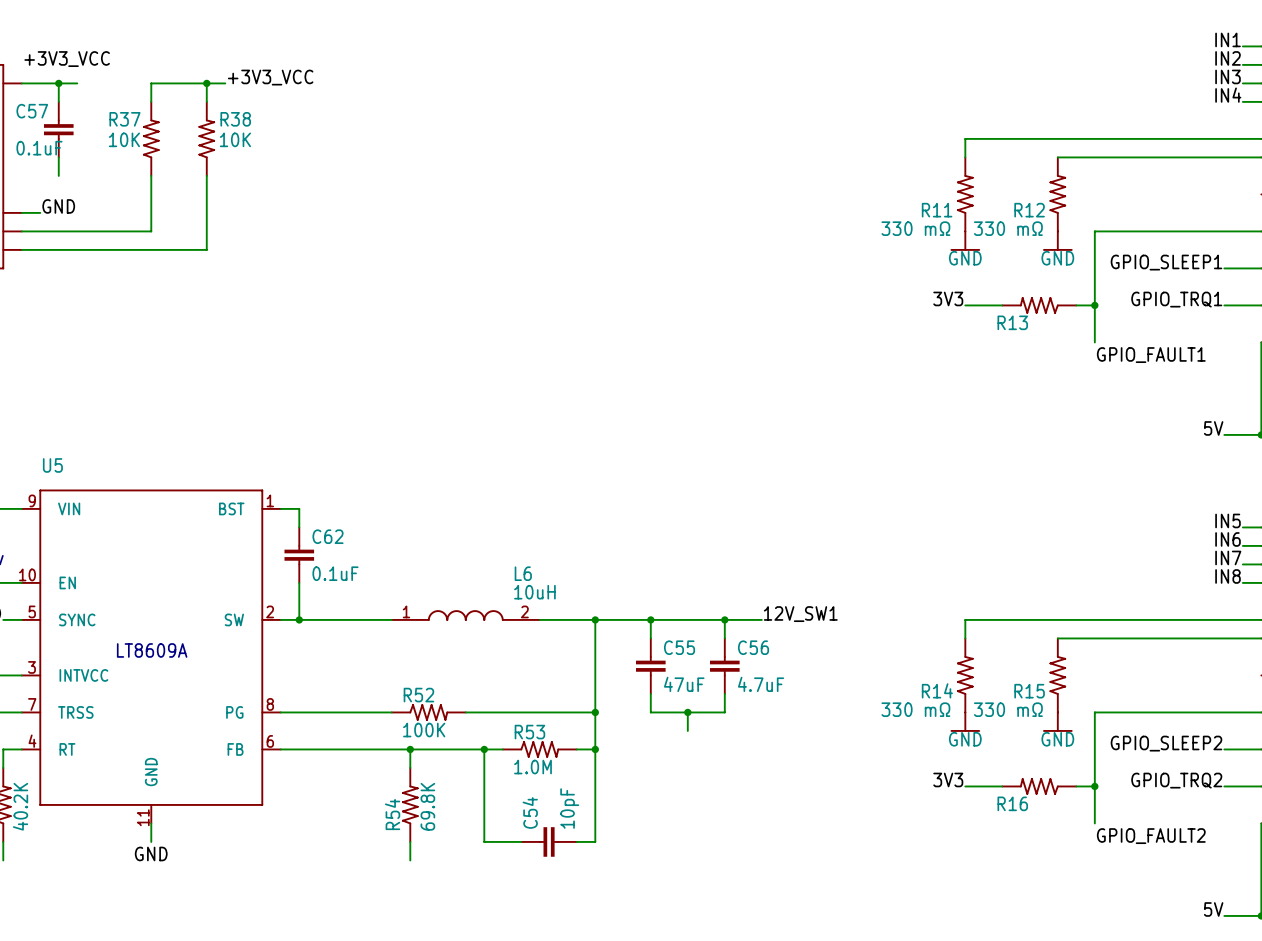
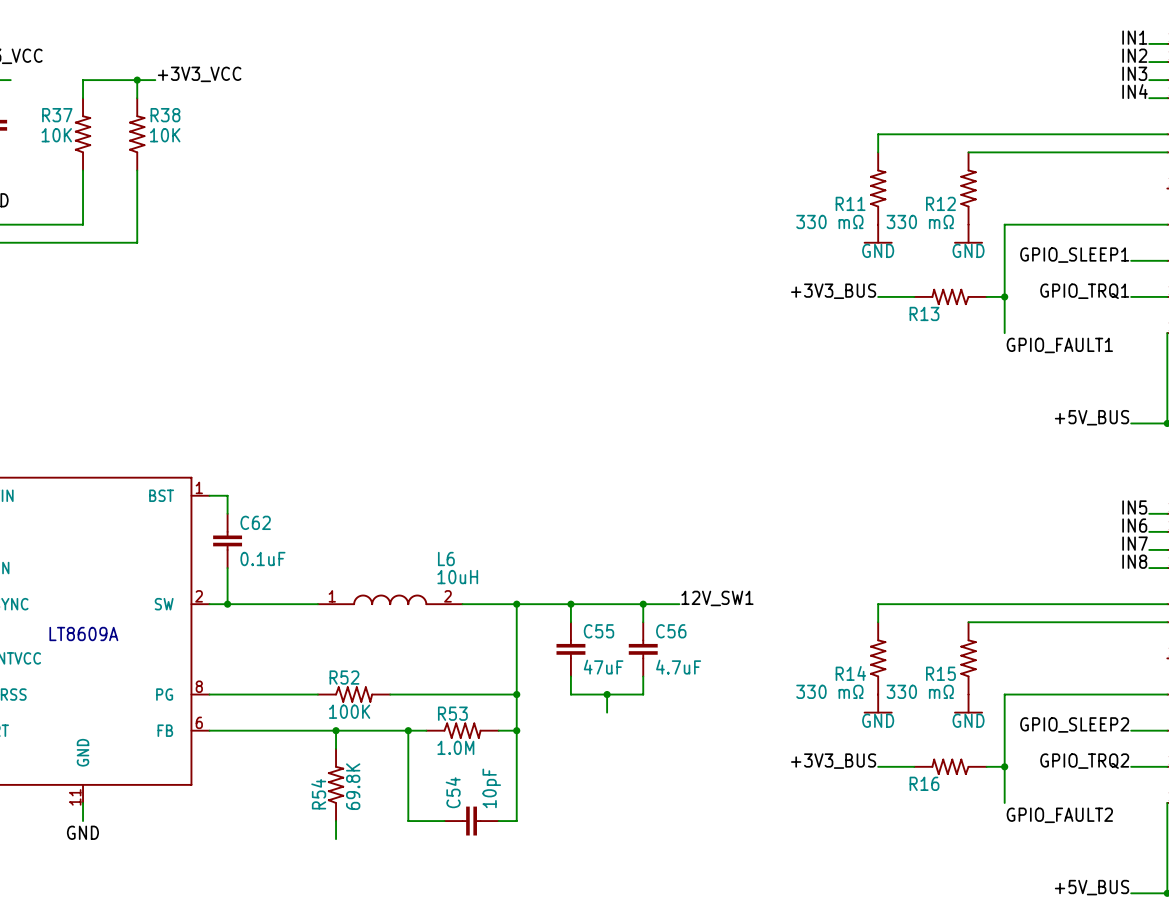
label: 3V3 (948, 298) -> +3V3_BUS (833, 291)
label: 5V (1213, 428) -> +5V_BUS (1092, 417)
label: 3V3 (948, 779) -> +3V3_BUS (833, 761)
label: 5V (1213, 909) -> +5V_BUS (1092, 887)

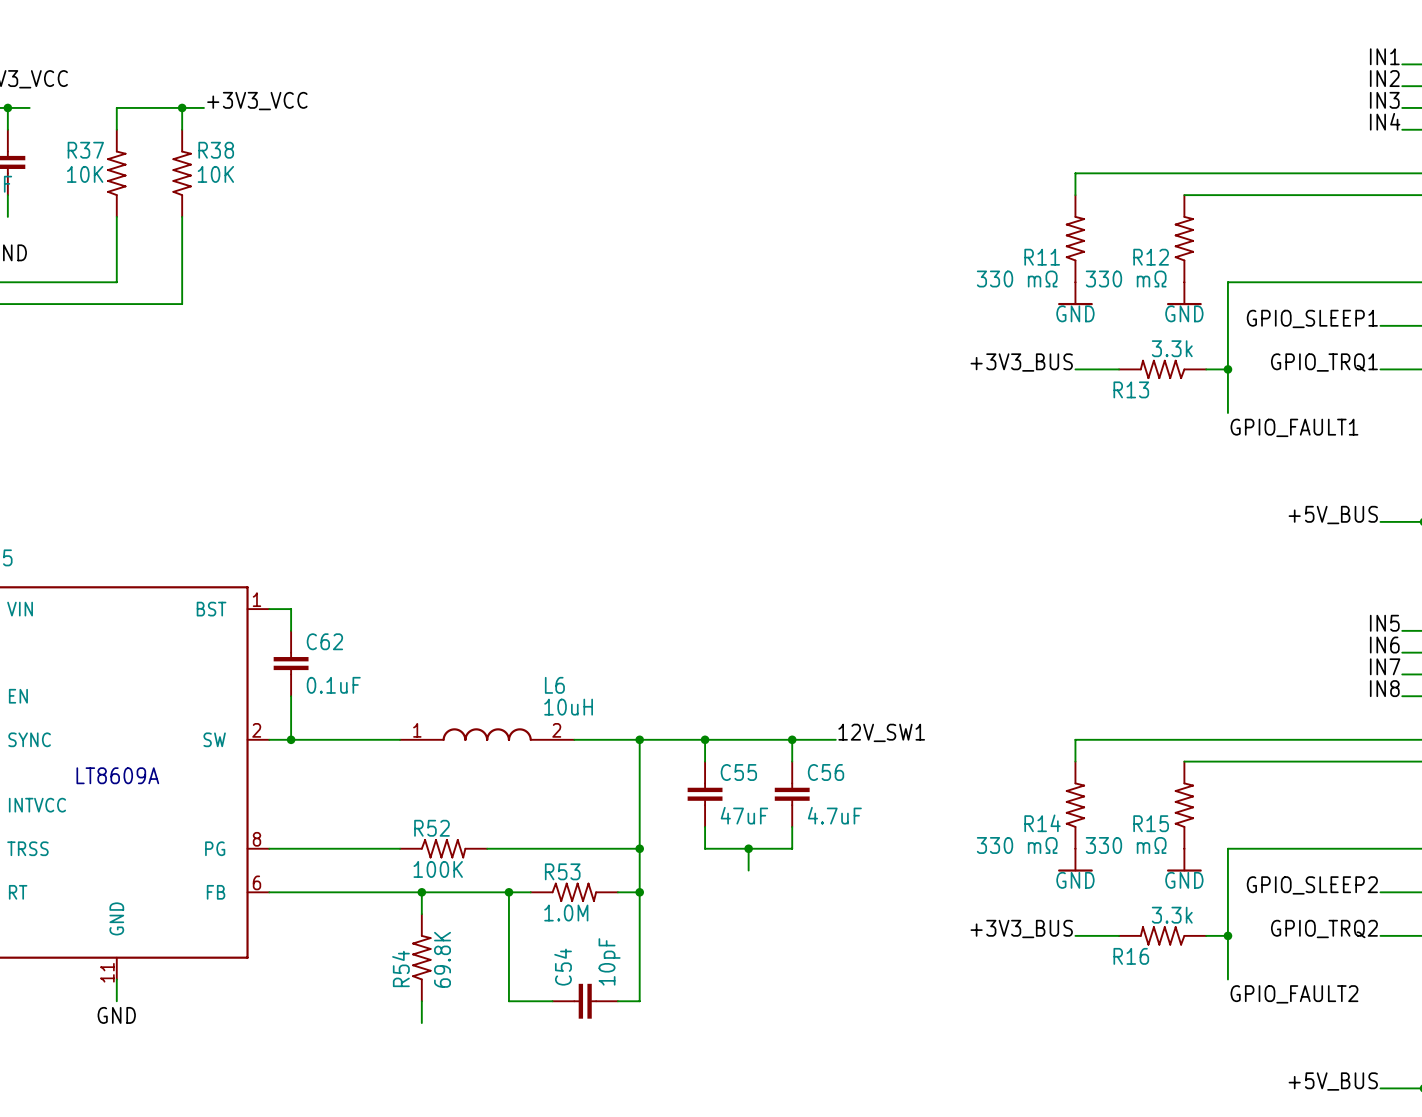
R13 value: none -> 3.3k (1172, 348)
R16 value: none -> 3.3k (1172, 915)

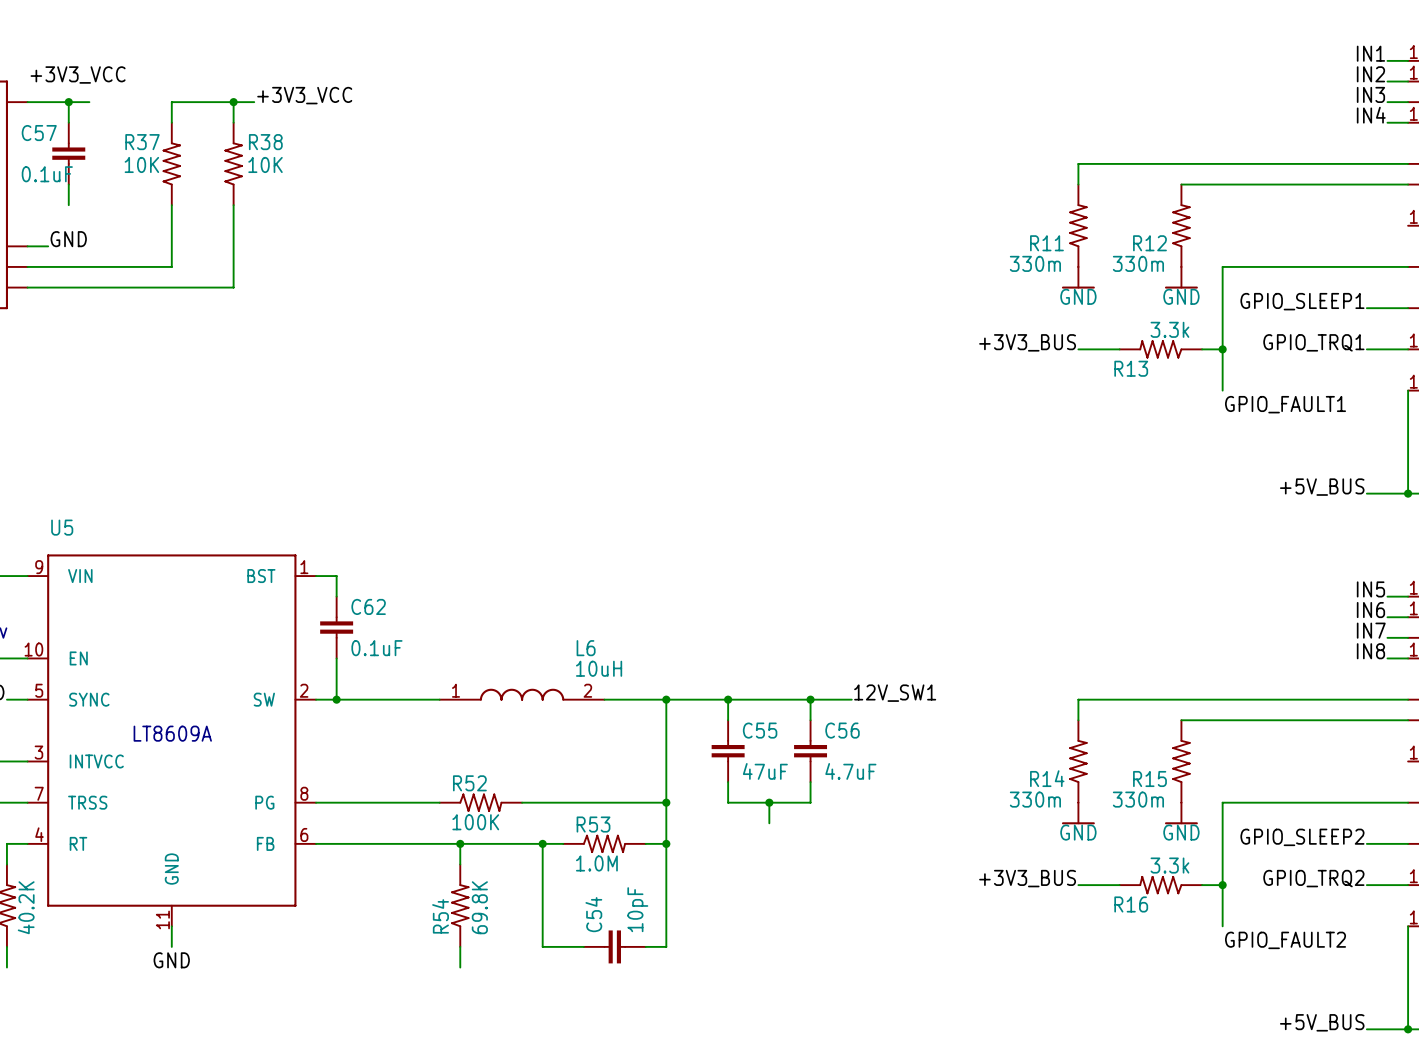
R11 value: 330 mΩ (1017, 279) -> 330m (1035, 263)
R12 value: 330 mΩ (1126, 279) -> 330m (1138, 263)
R14 value: 330 mΩ (1017, 845) -> 330m (1035, 799)
R15 value: 330 mΩ (1126, 845) -> 330m (1138, 799)

